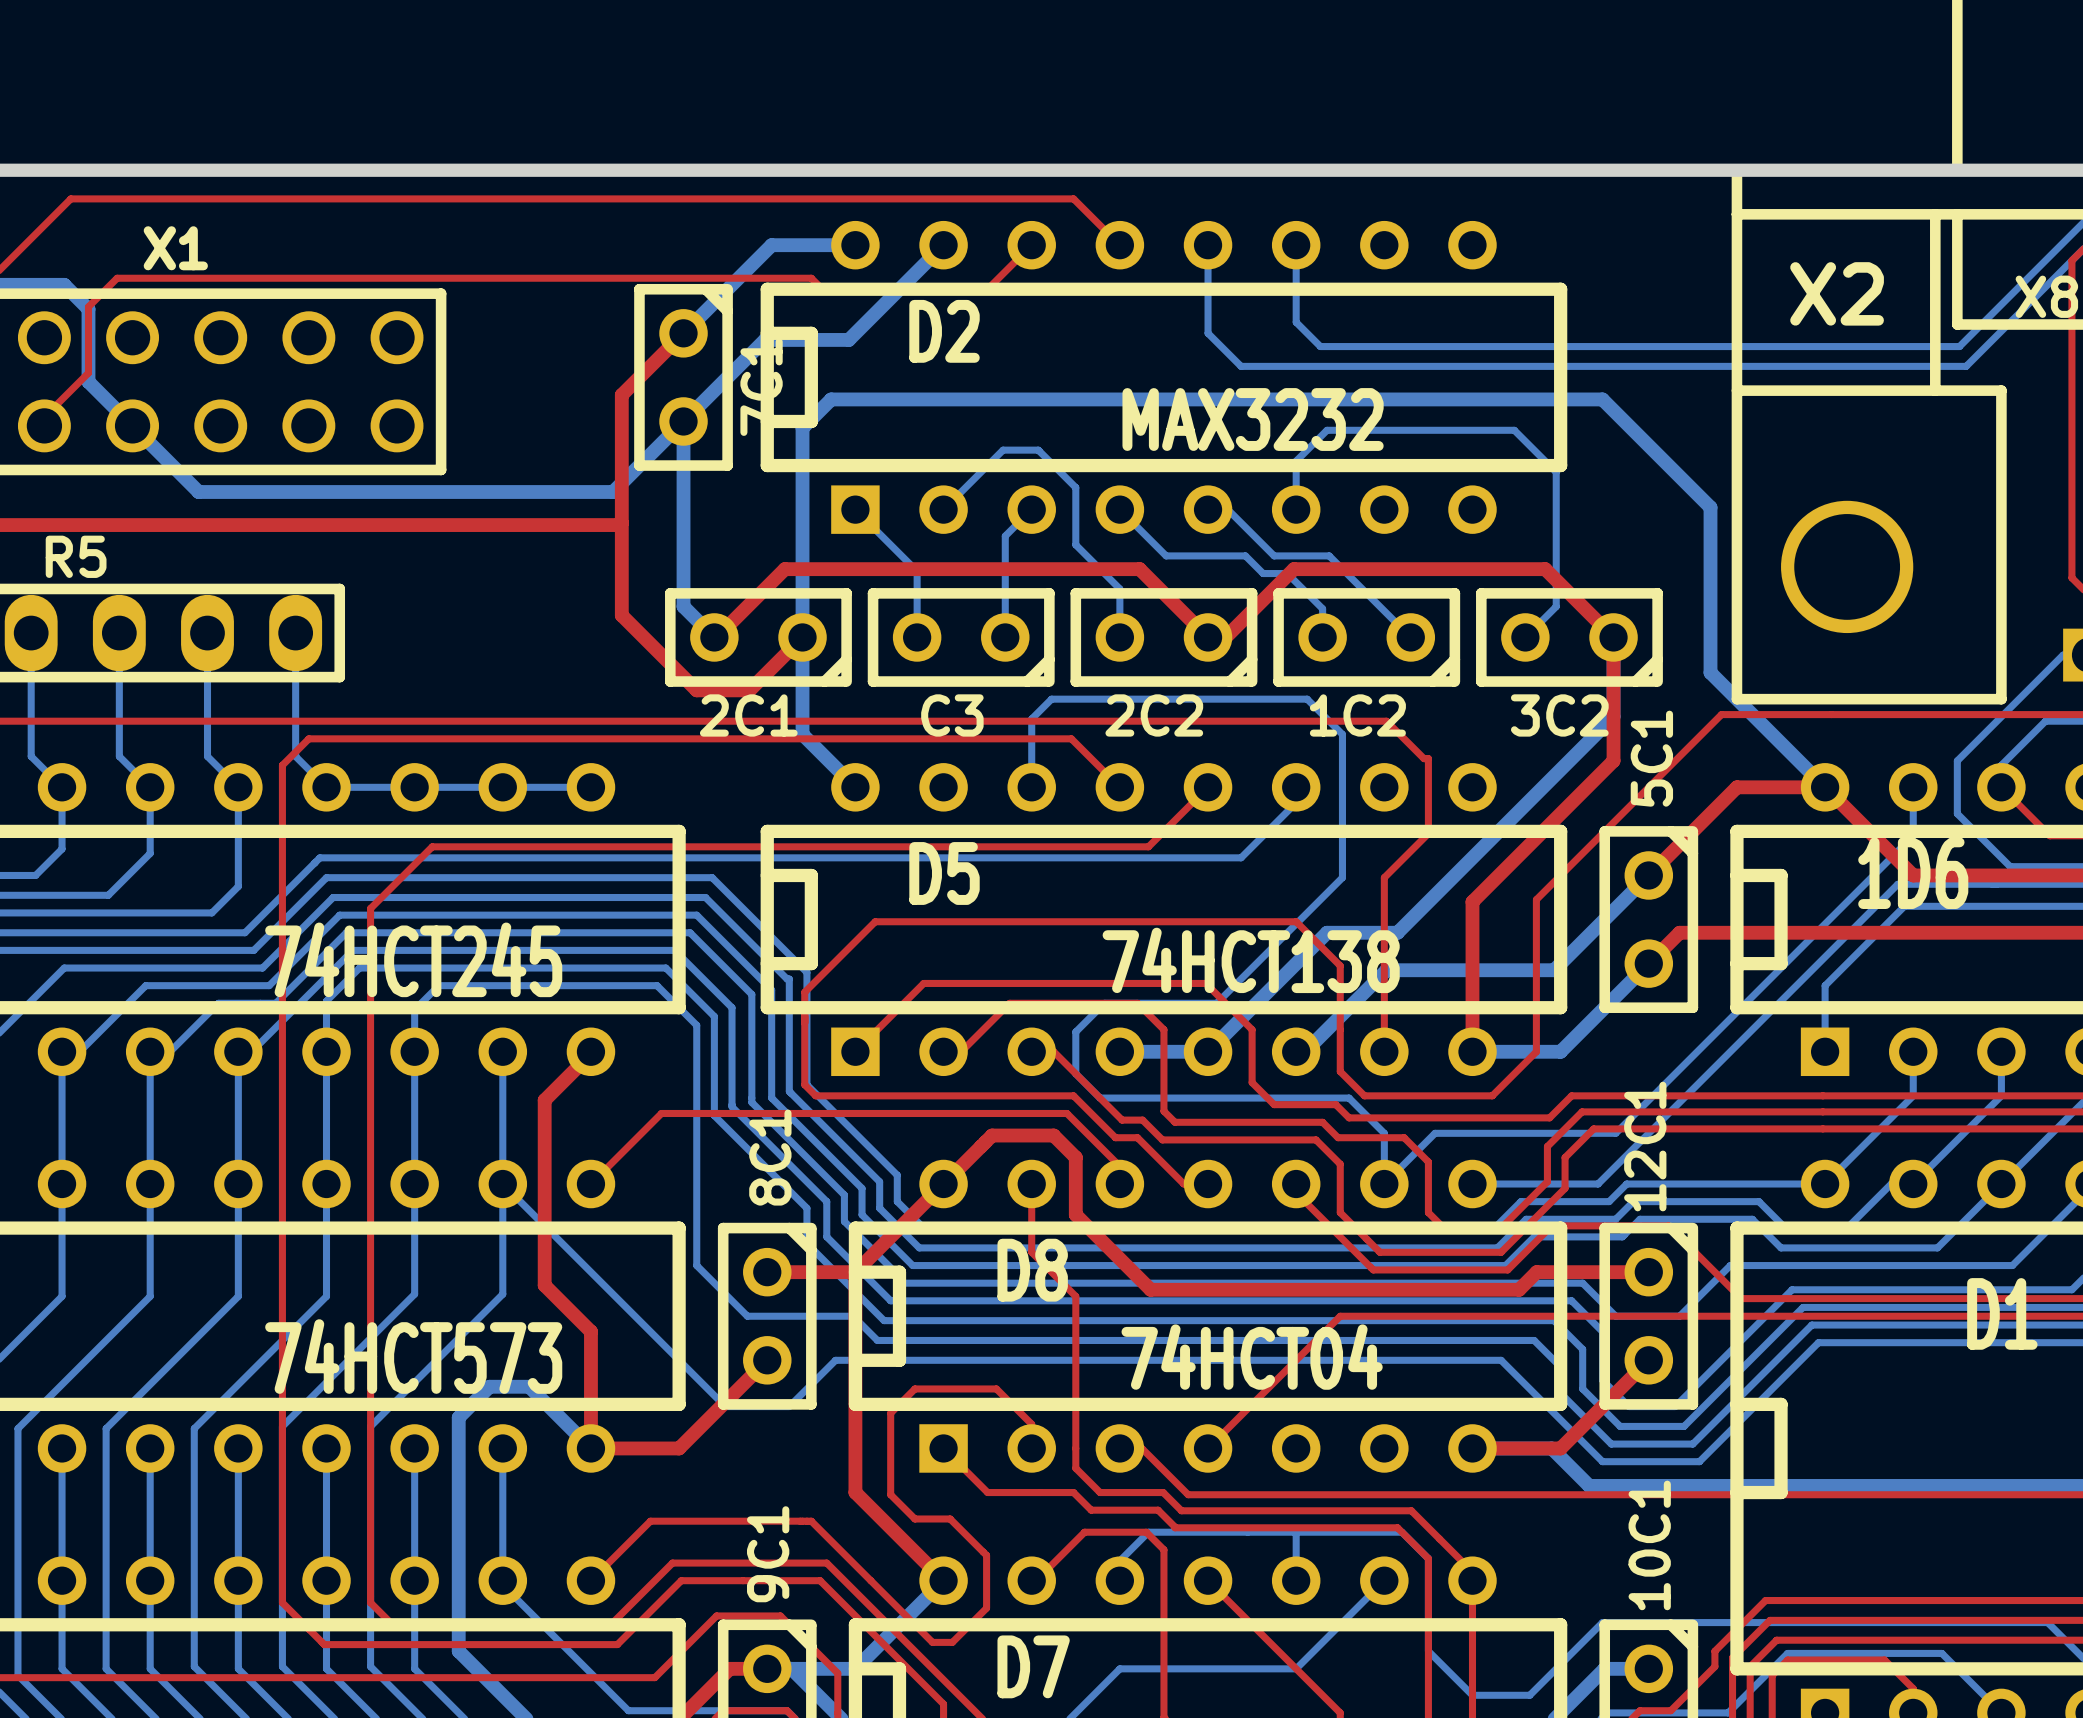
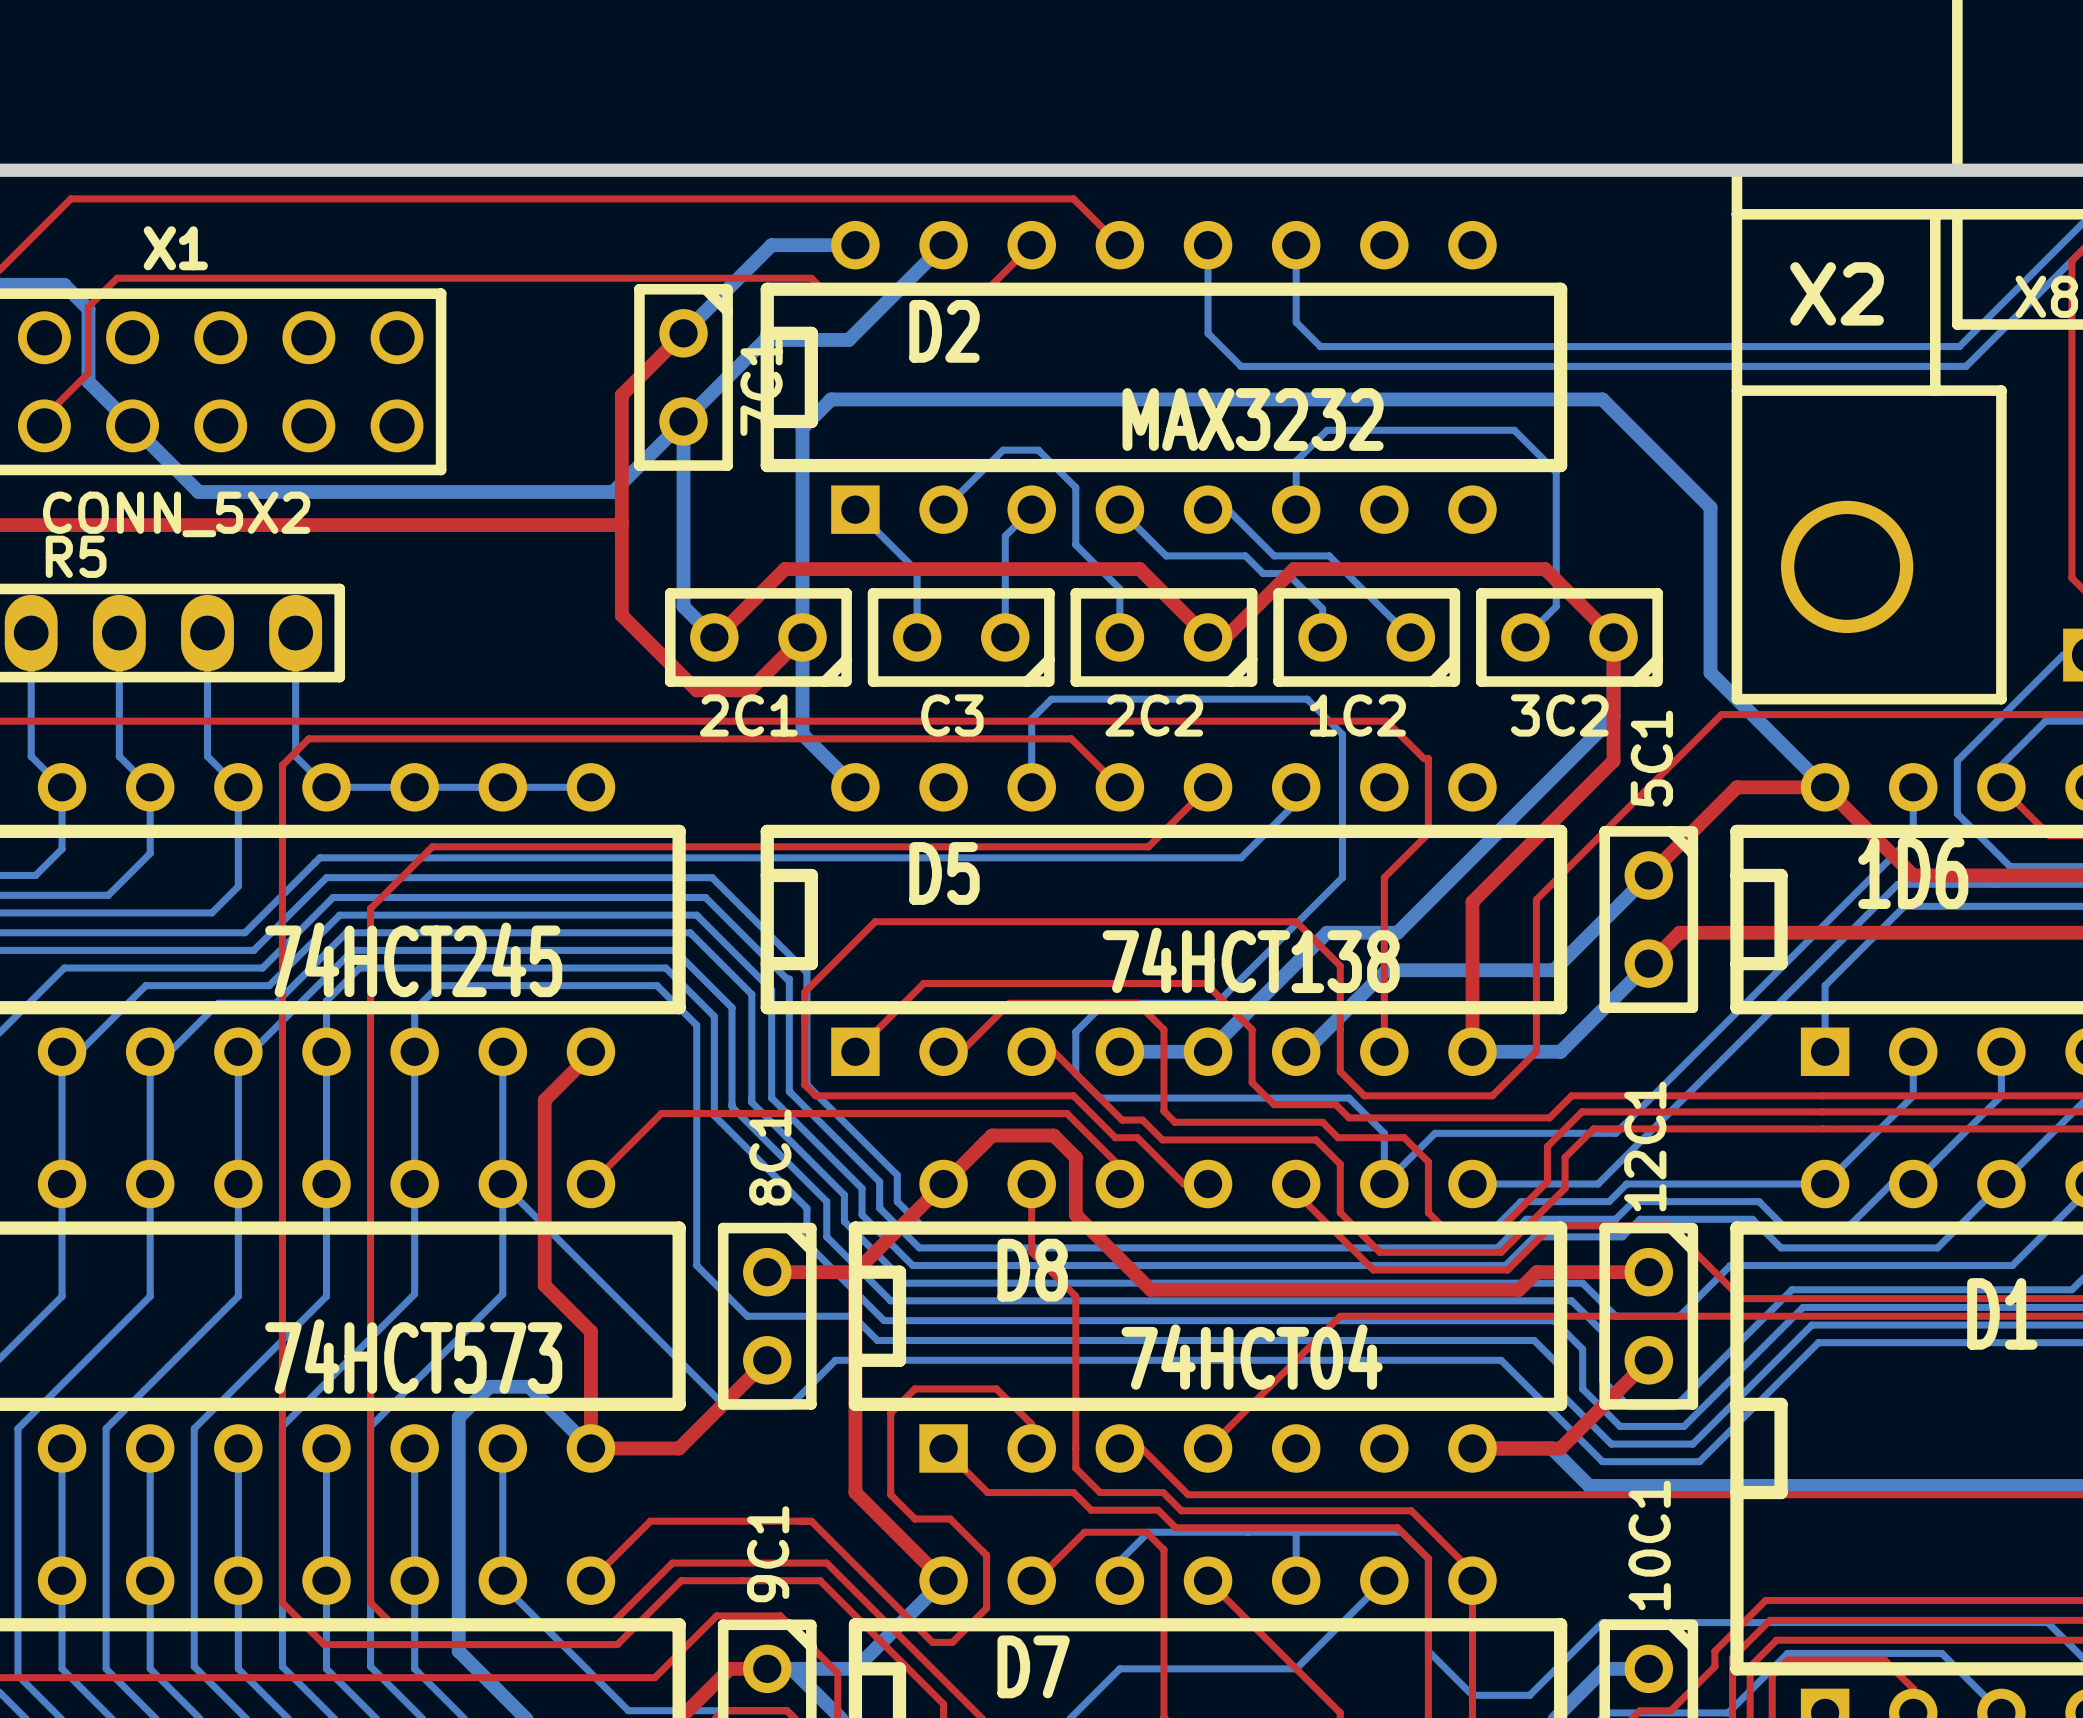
X1 value: none -> CONN_5X2 (176, 514)

